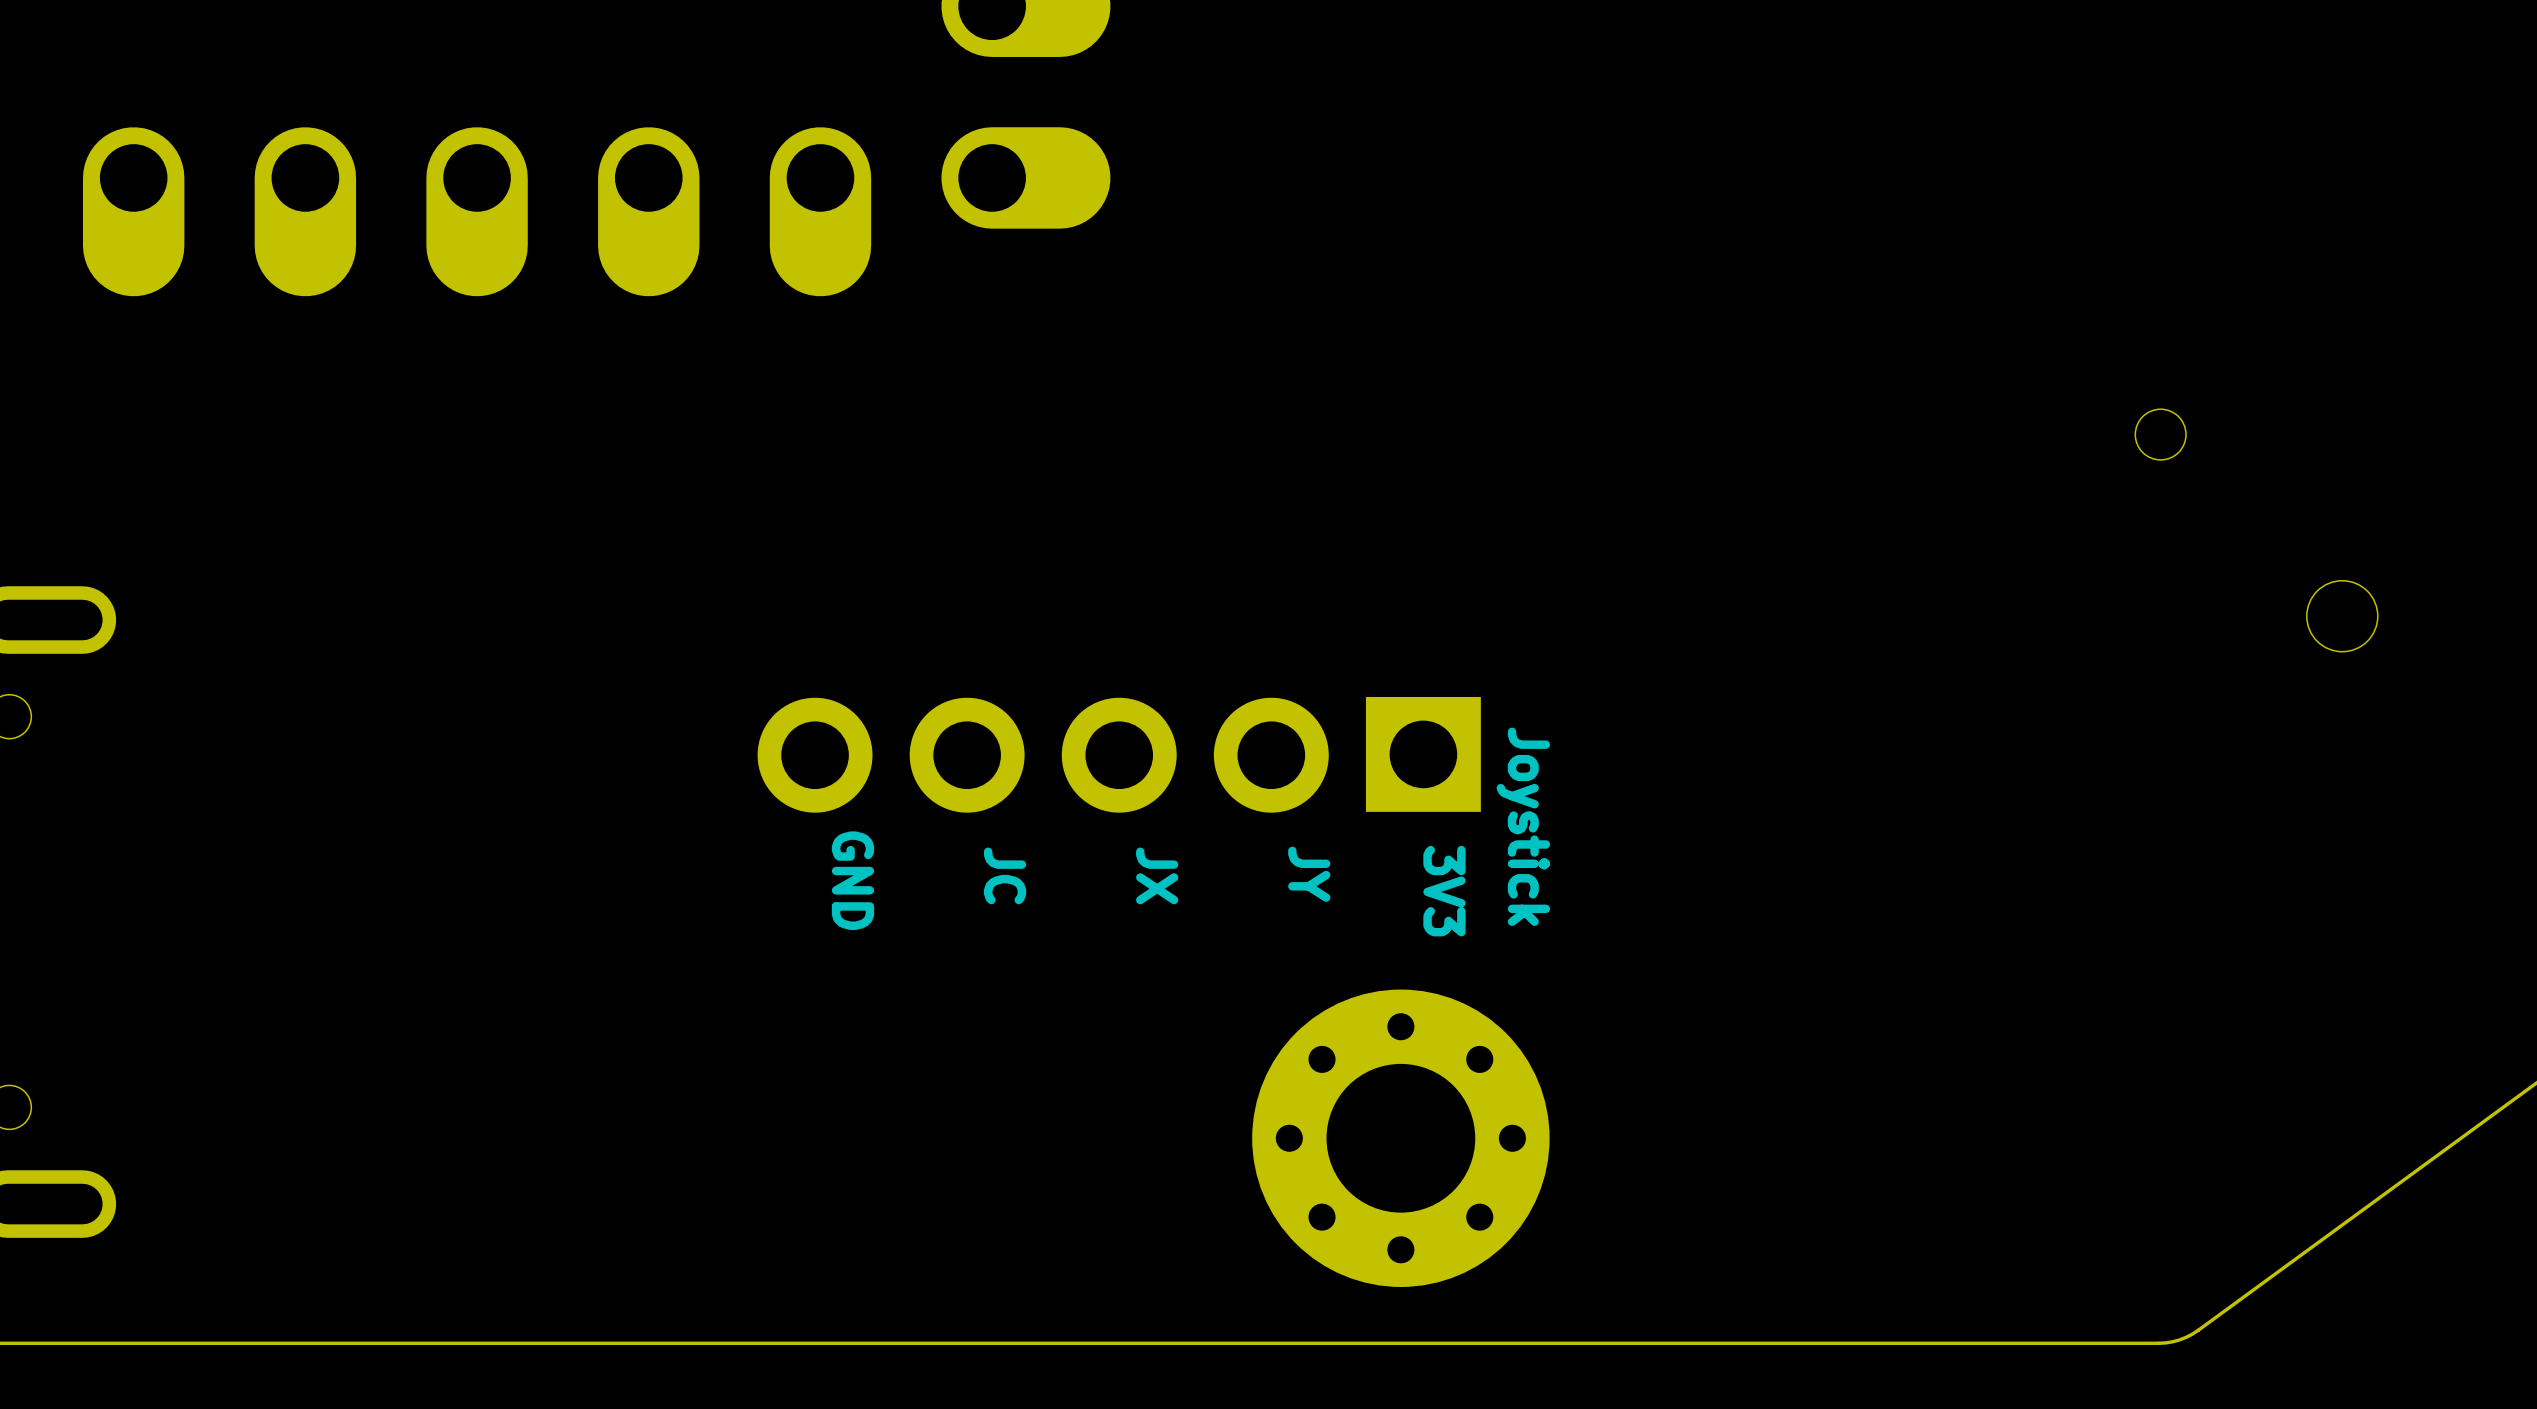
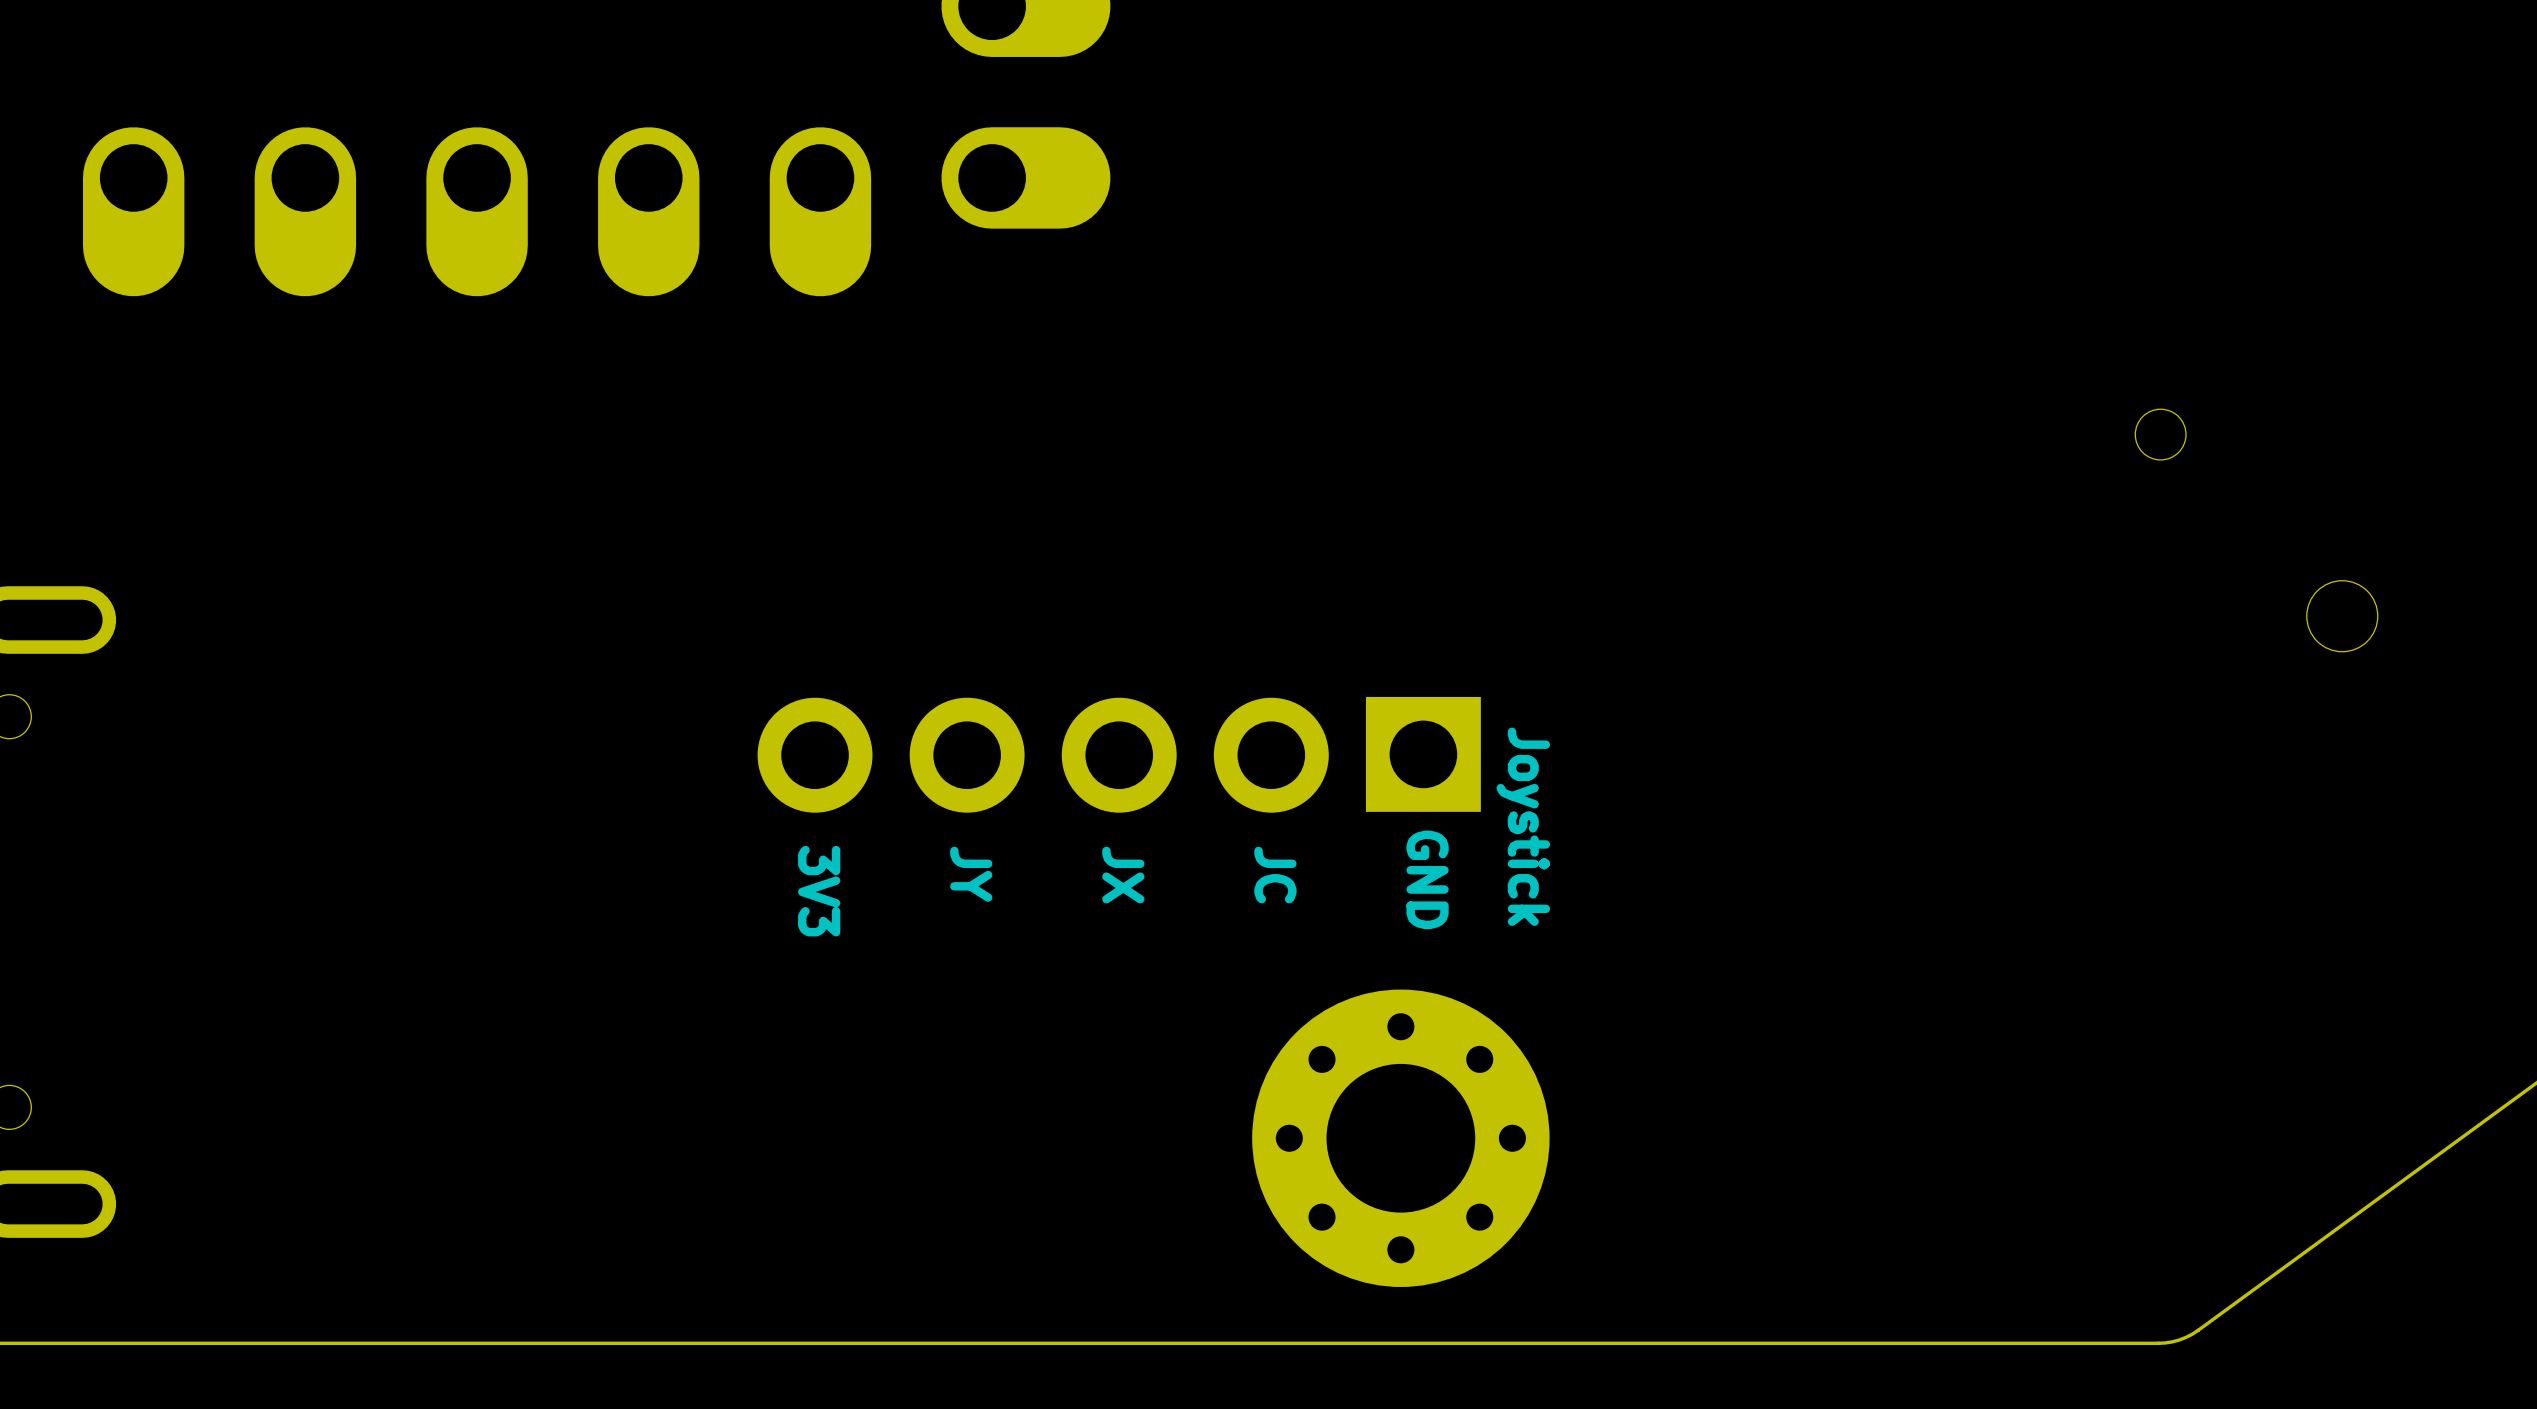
part text position: JY (1309, 874) -> JY (971, 874)
part text position: JC (1005, 875) -> JC (1275, 875)
part text position: JX (1157, 875) -> JX (1123, 875)
part text position: GND (852, 880) -> GND (1427, 879)
part text position: 3V3 (1444, 891) -> 3V3 (819, 891)

